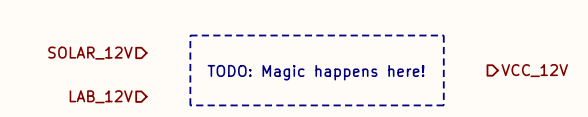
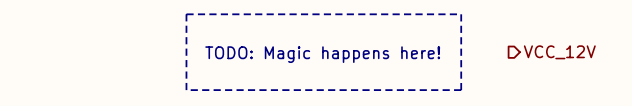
hierarchical label: SOLAR_12V (90, 53) -> none
hierarchical label: LAB_12V (101, 96) -> none

